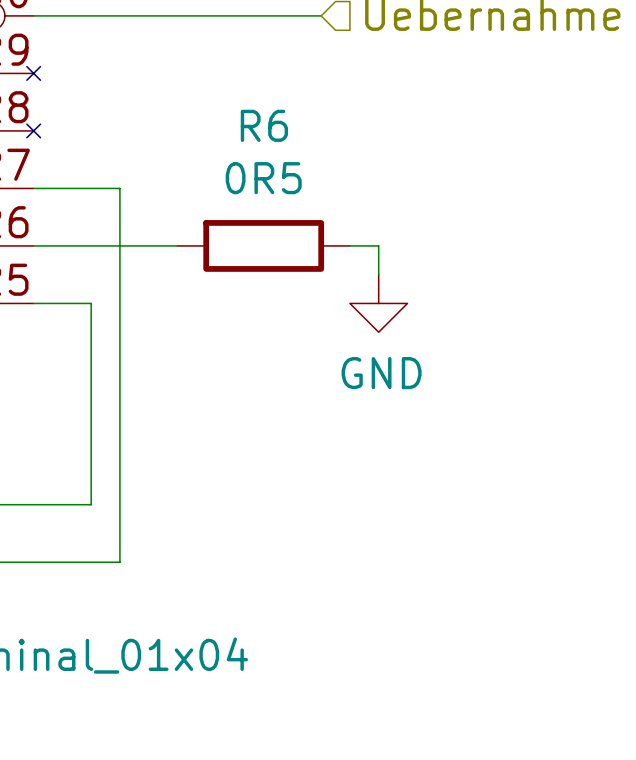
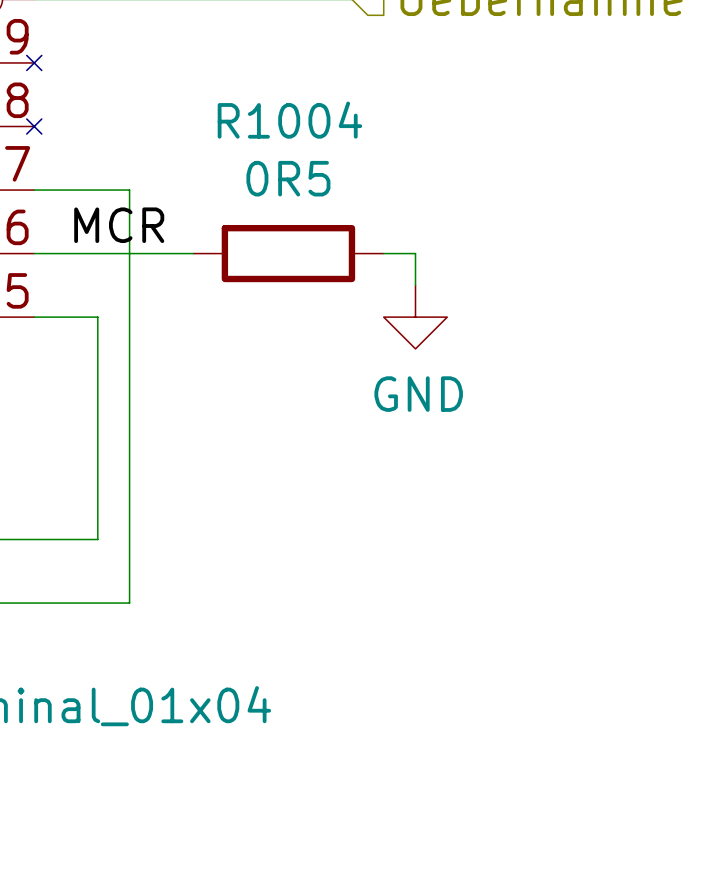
R6 name: R6 (264, 125) -> R1004 (289, 120)
label: none -> MCR (119, 225)

